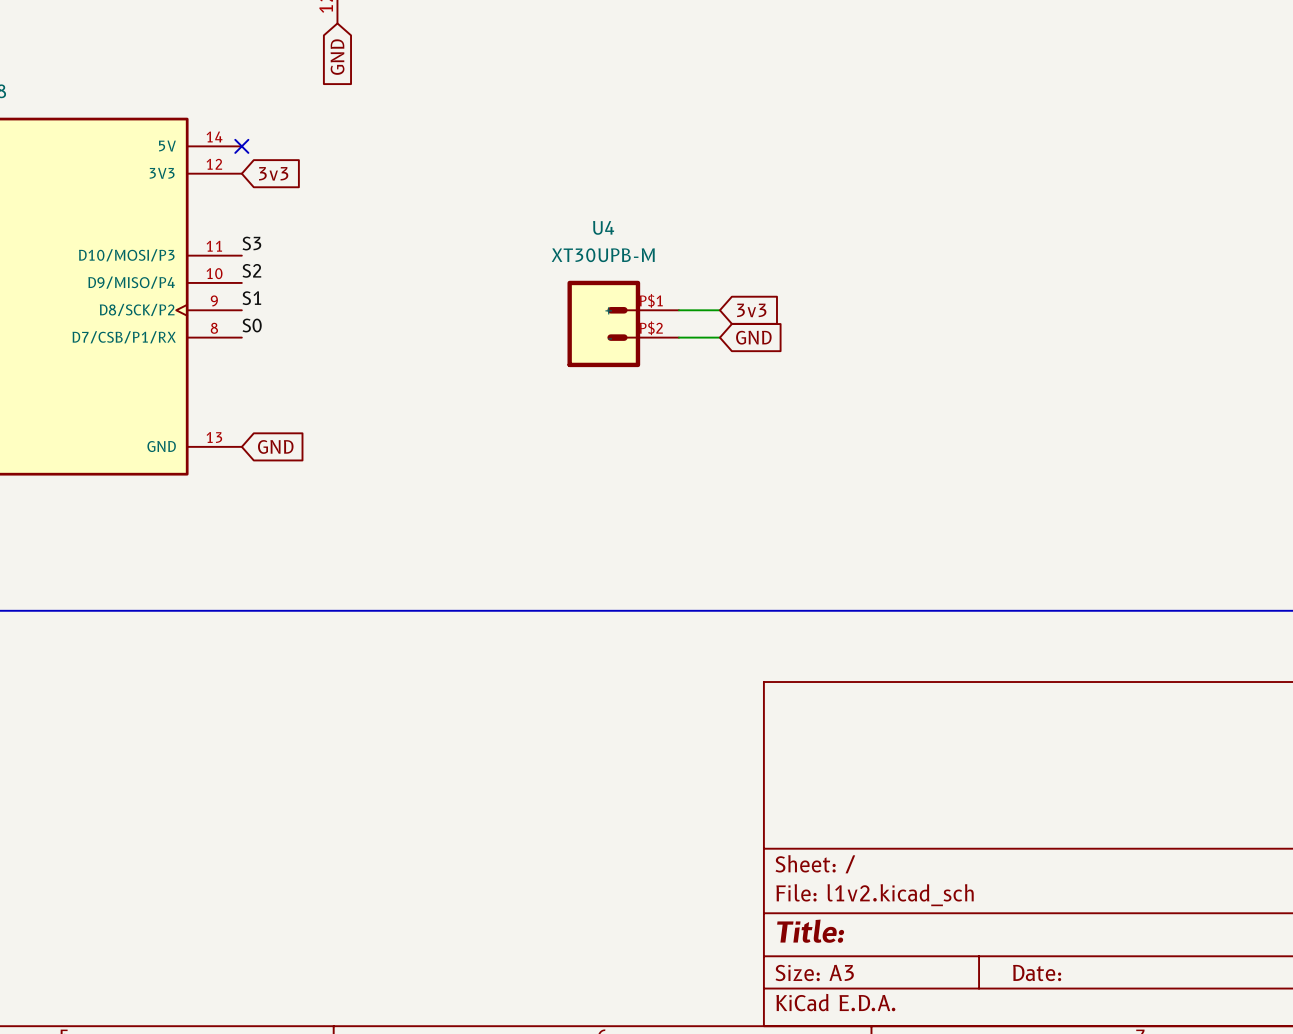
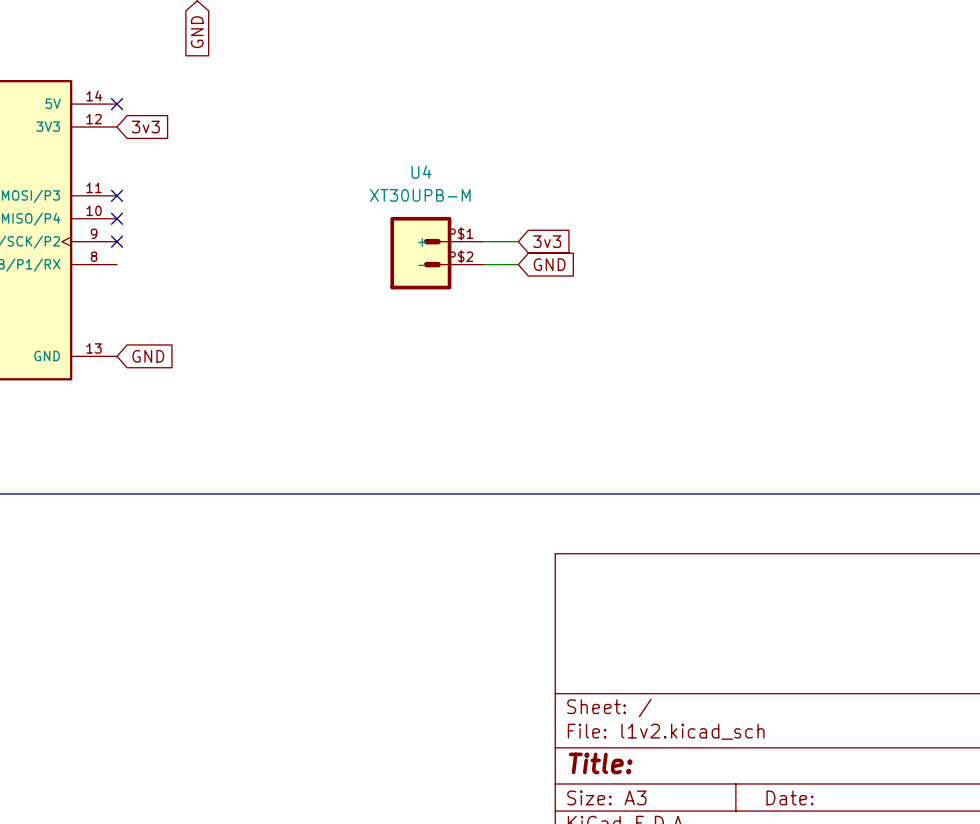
label: S3 (251, 243) -> none
no-connect mark: none -> (117, 195)
label: S2 (251, 270) -> none
no-connect mark: none -> (117, 218)
label: S1 (251, 298) -> none
no-connect mark: none -> (117, 241)
label: S0 (252, 325) -> none

